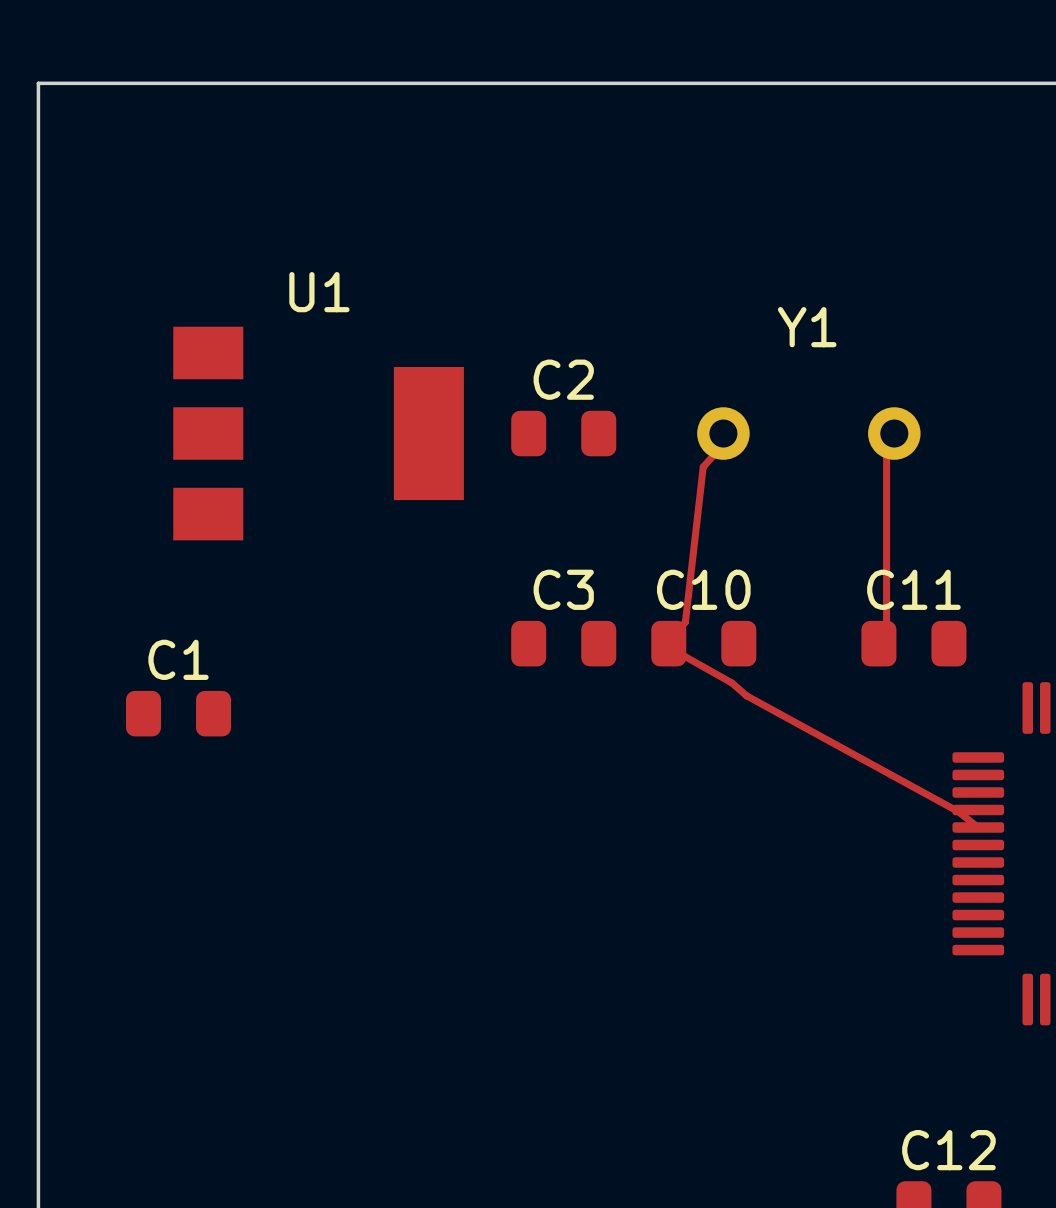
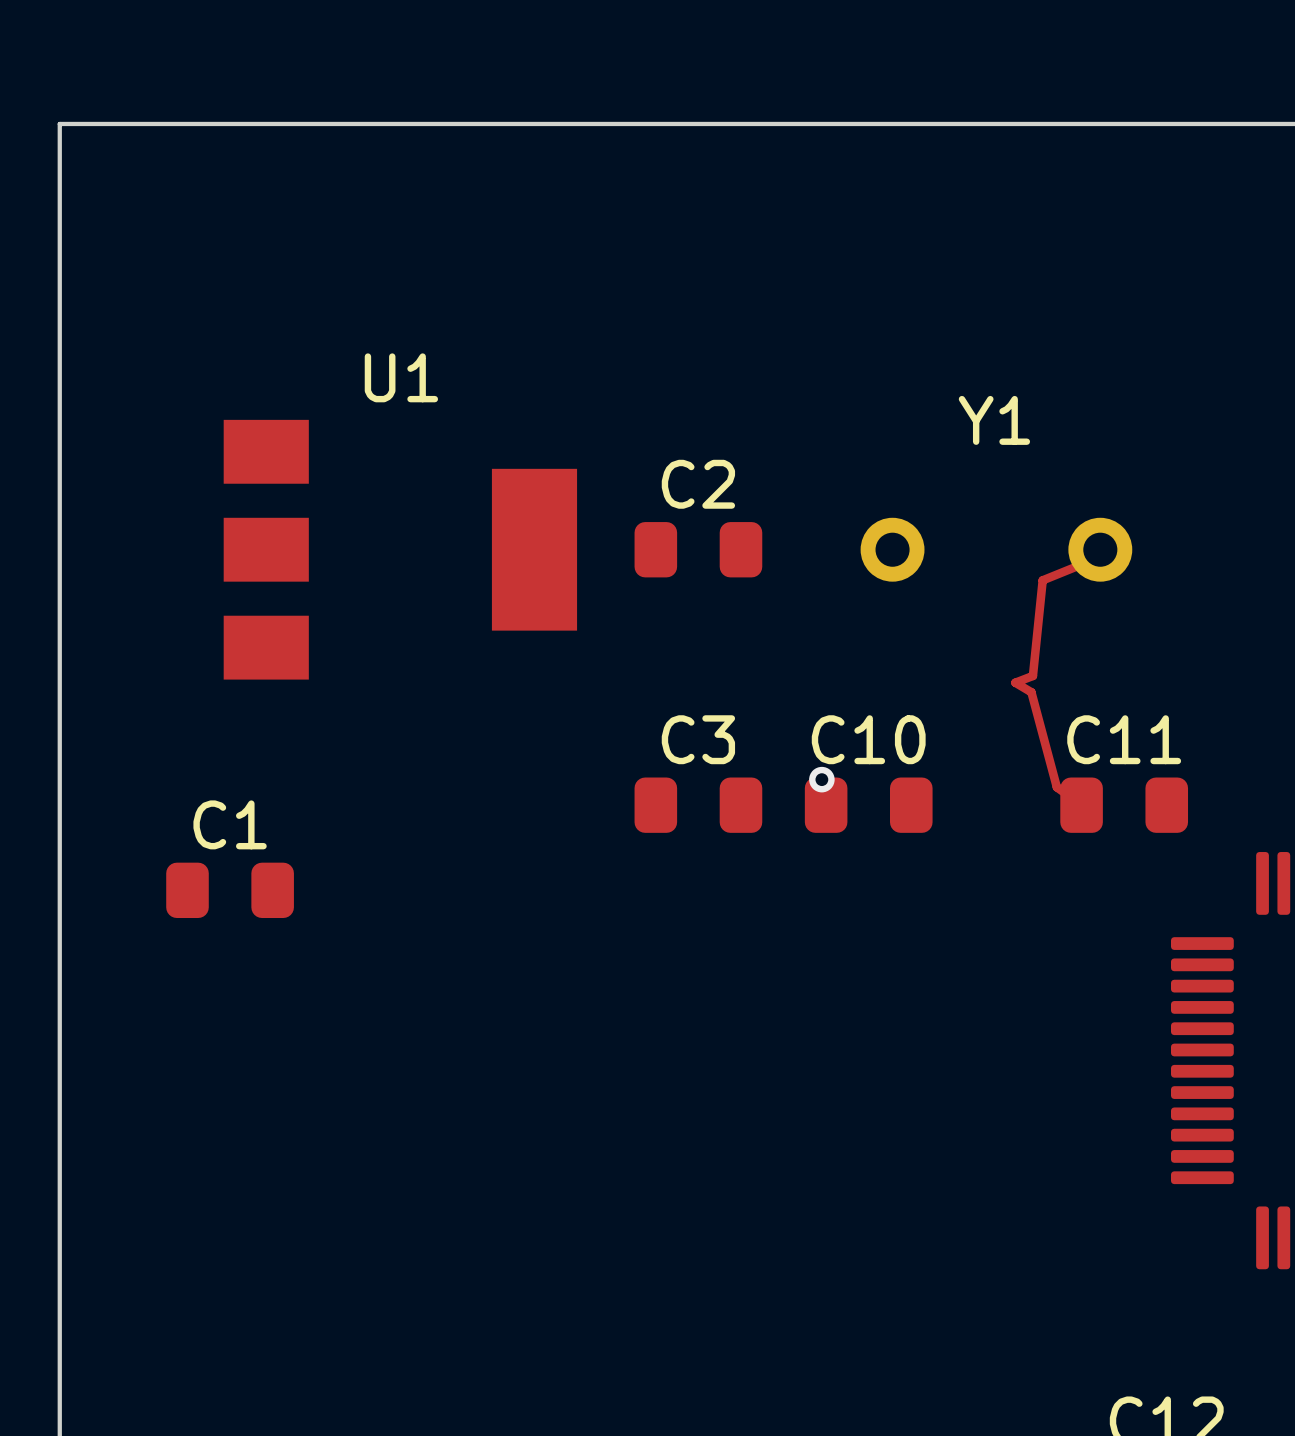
track: (723, 433) (718, 449) (703, 467) (685, 622) (668, 643) (676, 651) (731, 683) (746, 695) (958, 811) (978, 827) -> none
track: (894, 433) (886, 457) (886, 622) (878, 643) -> (1100, 549) (1091, 547) (1090, 561) (1042, 580) (1032, 675) (1015, 682) (1031, 692) (1056, 787) (1081, 805)
via: none -> (821, 779)

